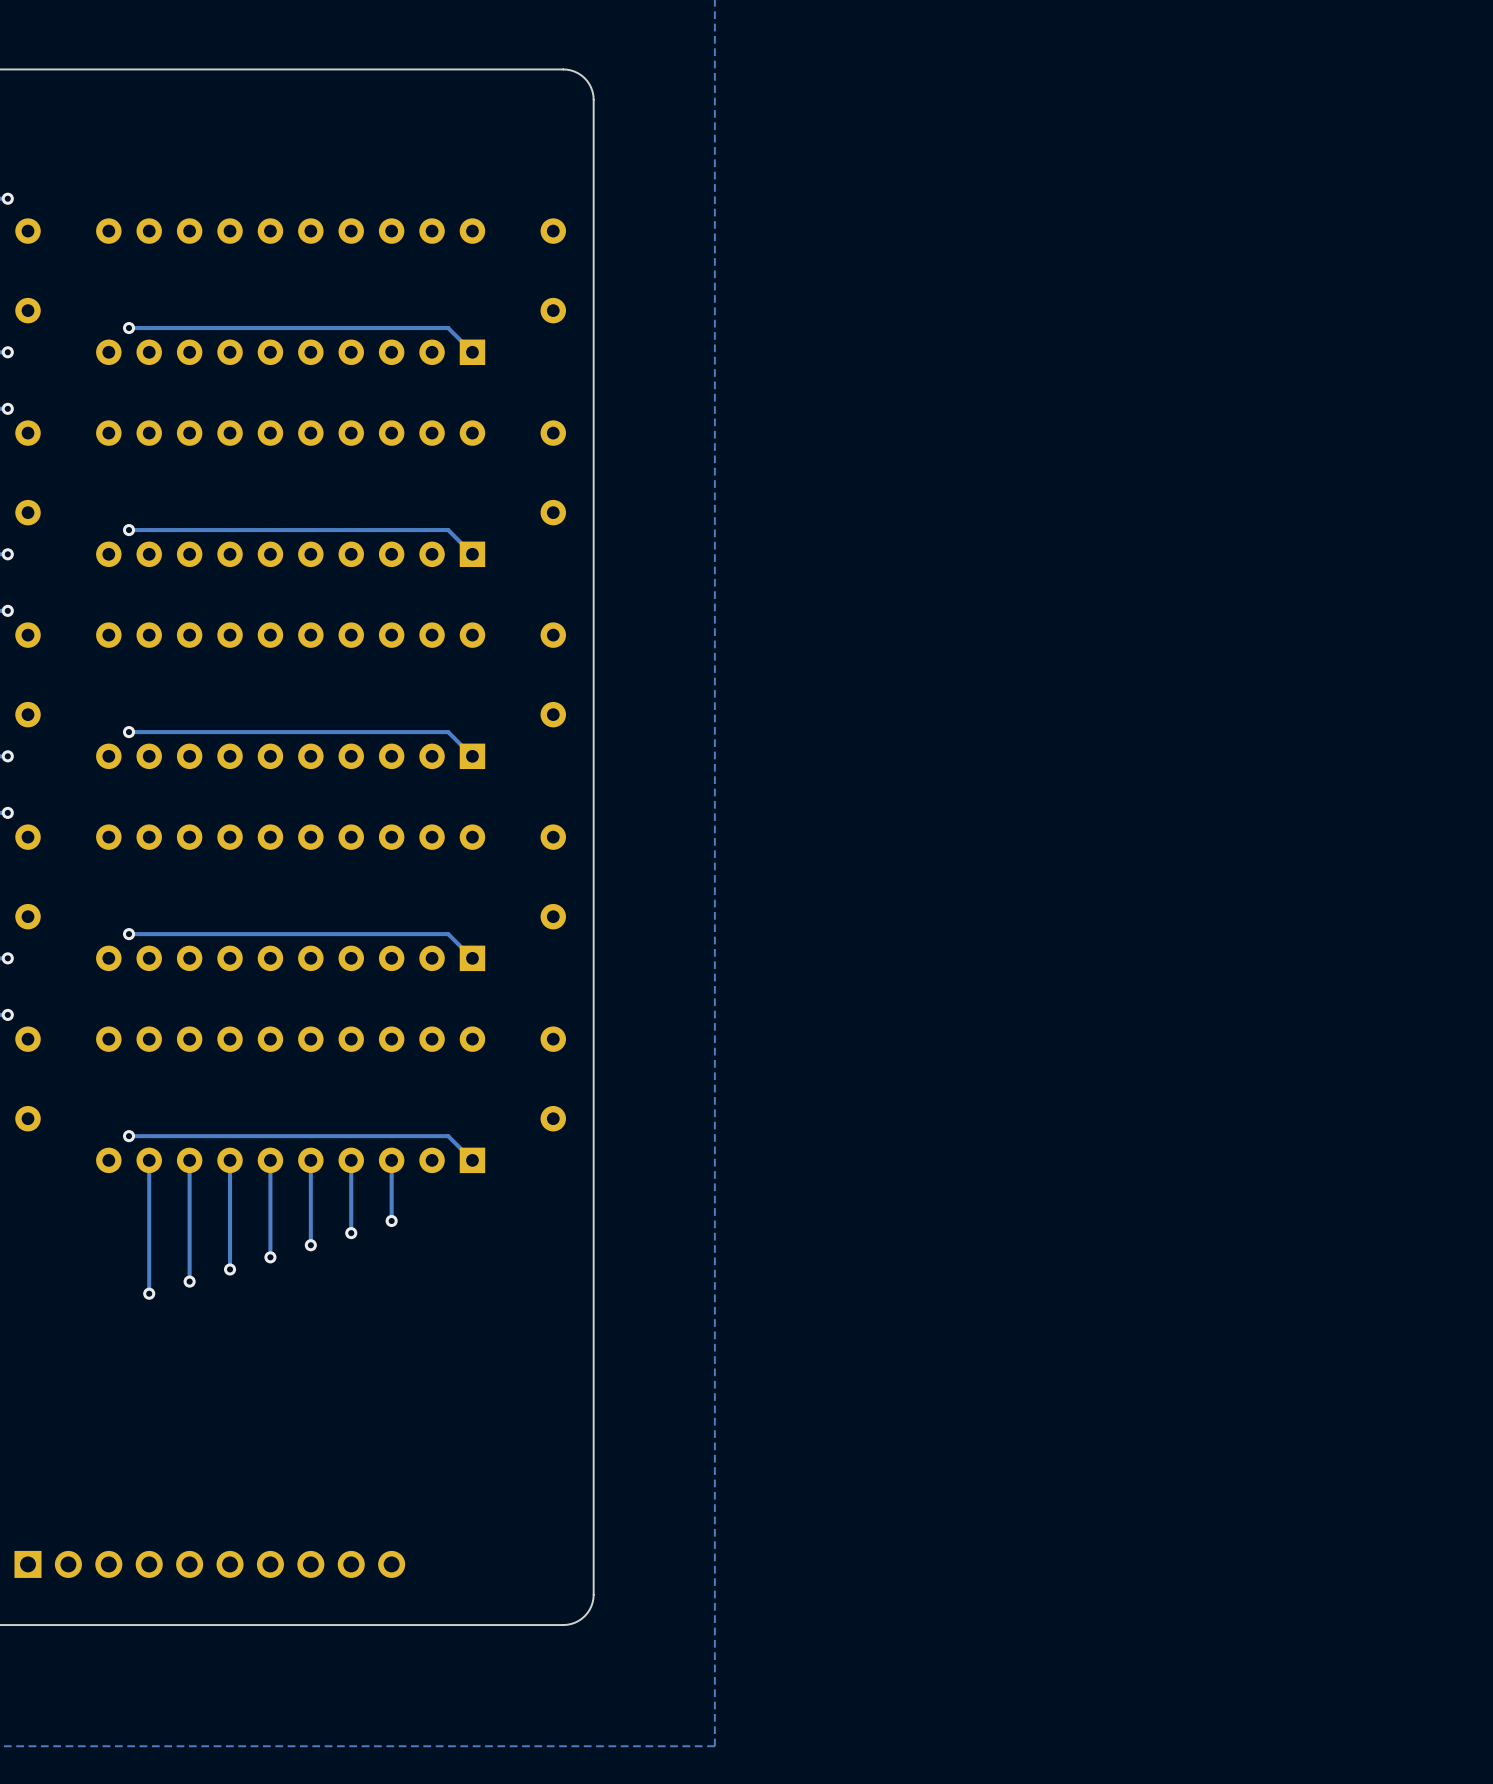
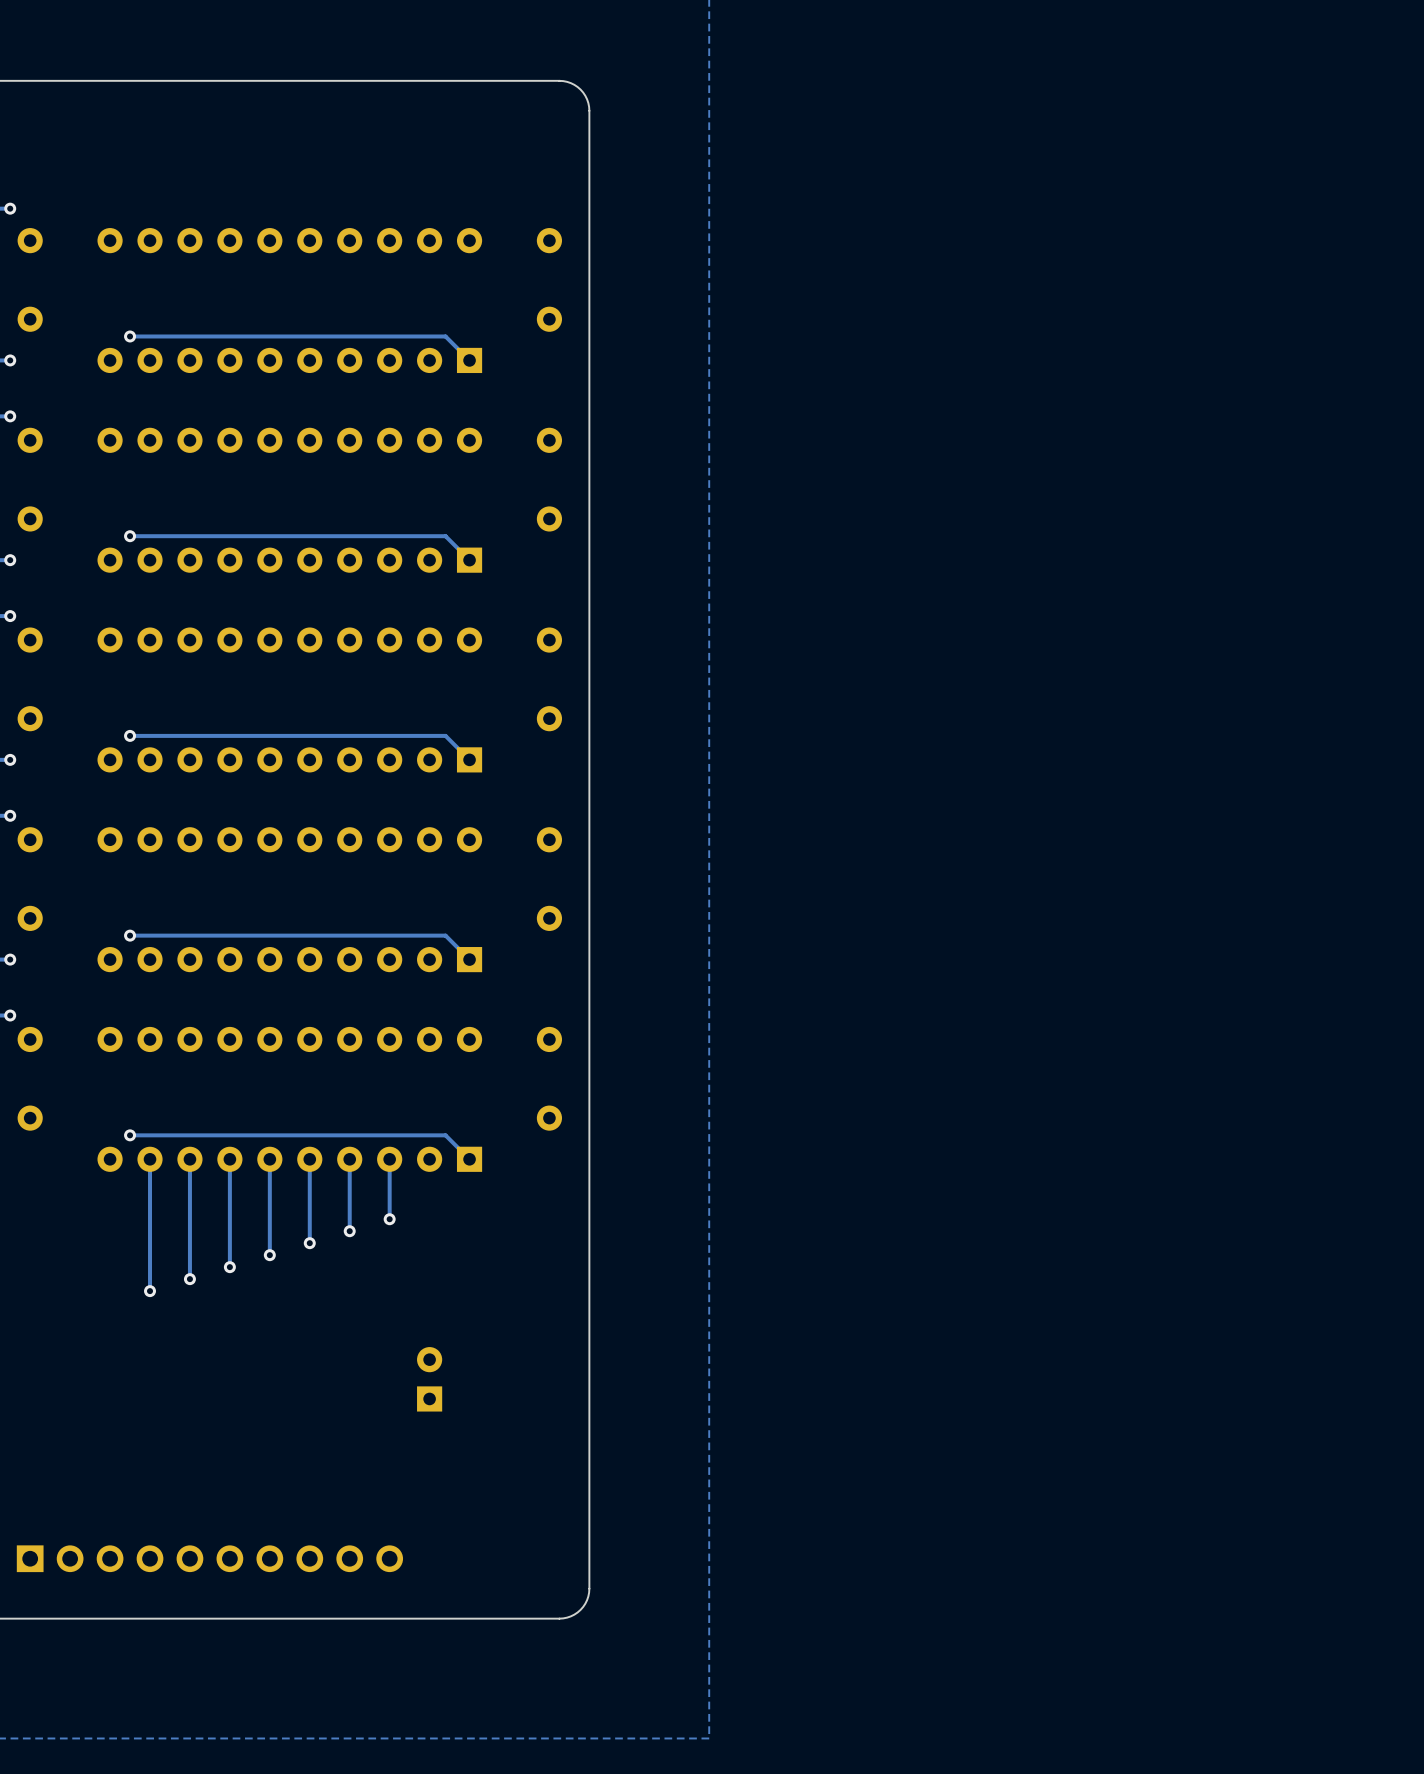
part: none -> (429, 1379)

